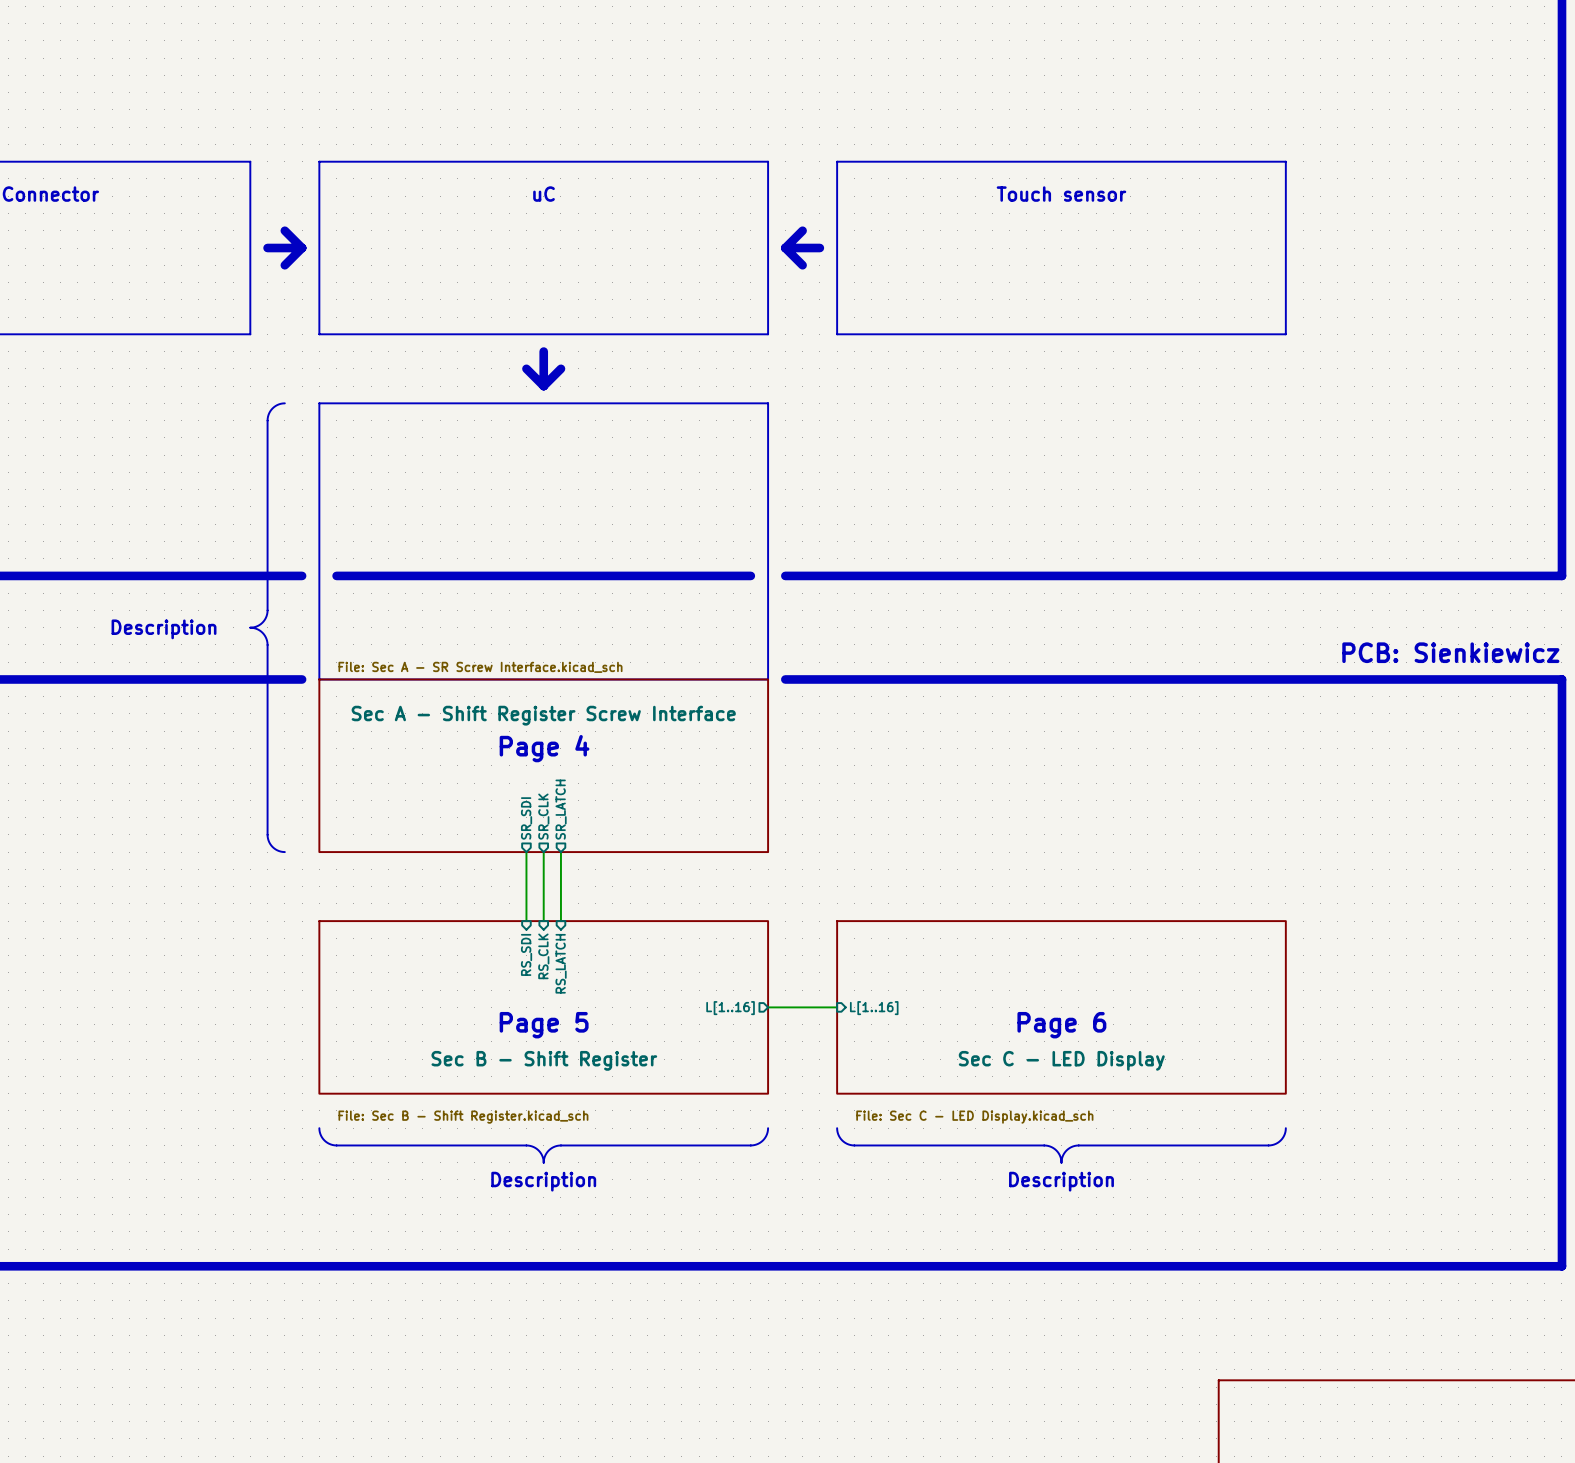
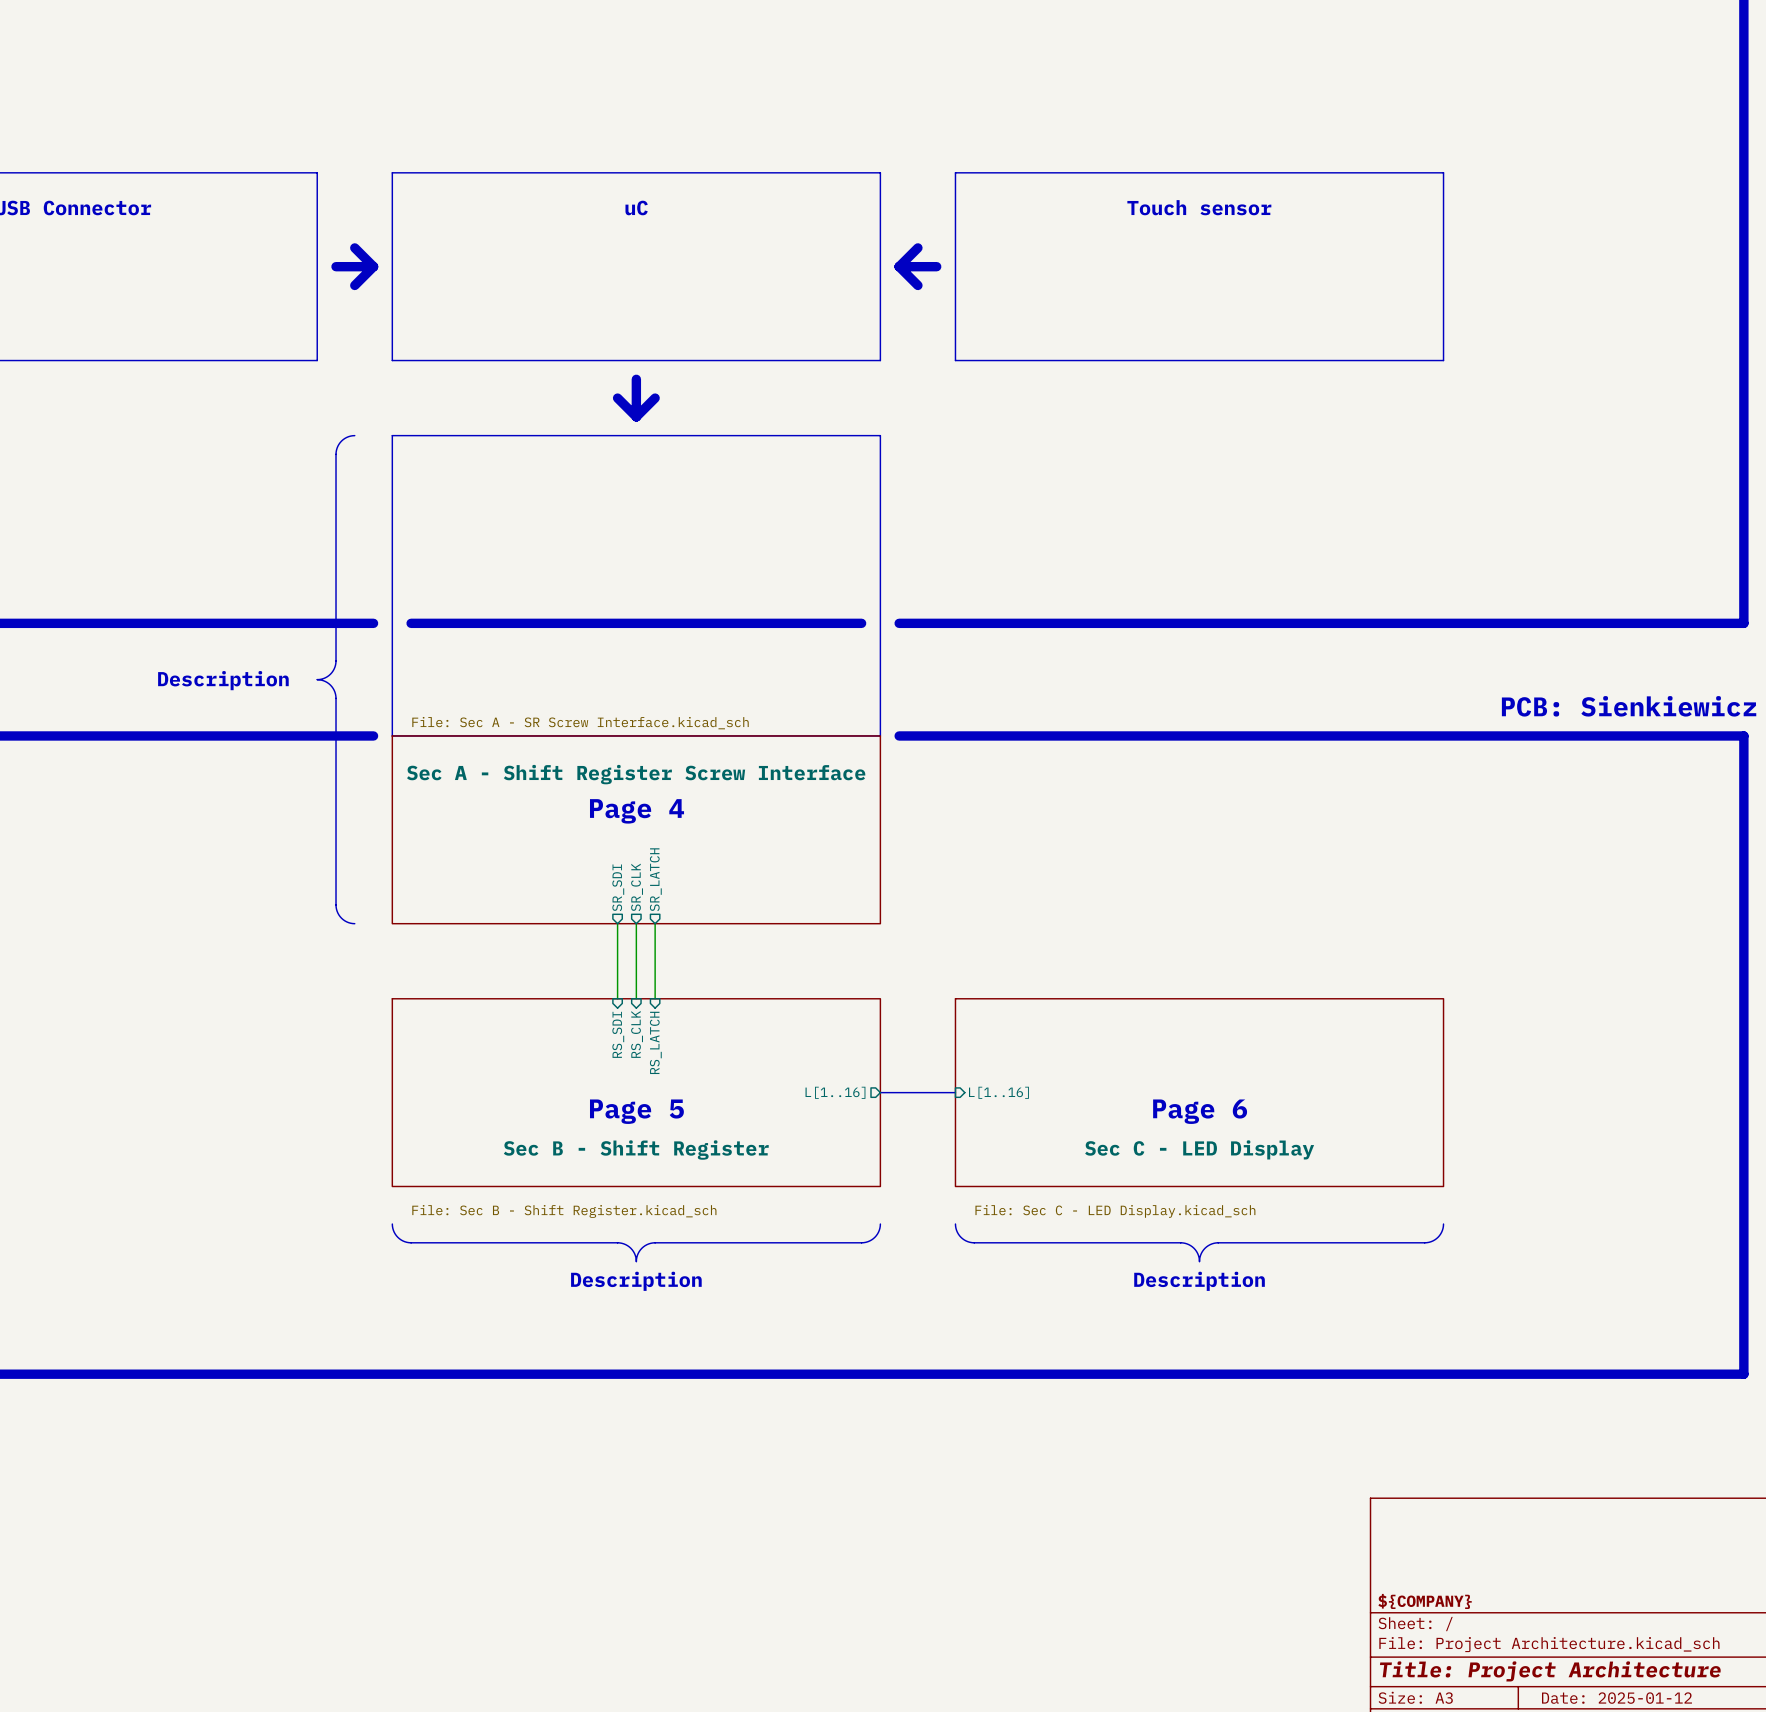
bus: none -> (880, 1092) (955, 1092)

